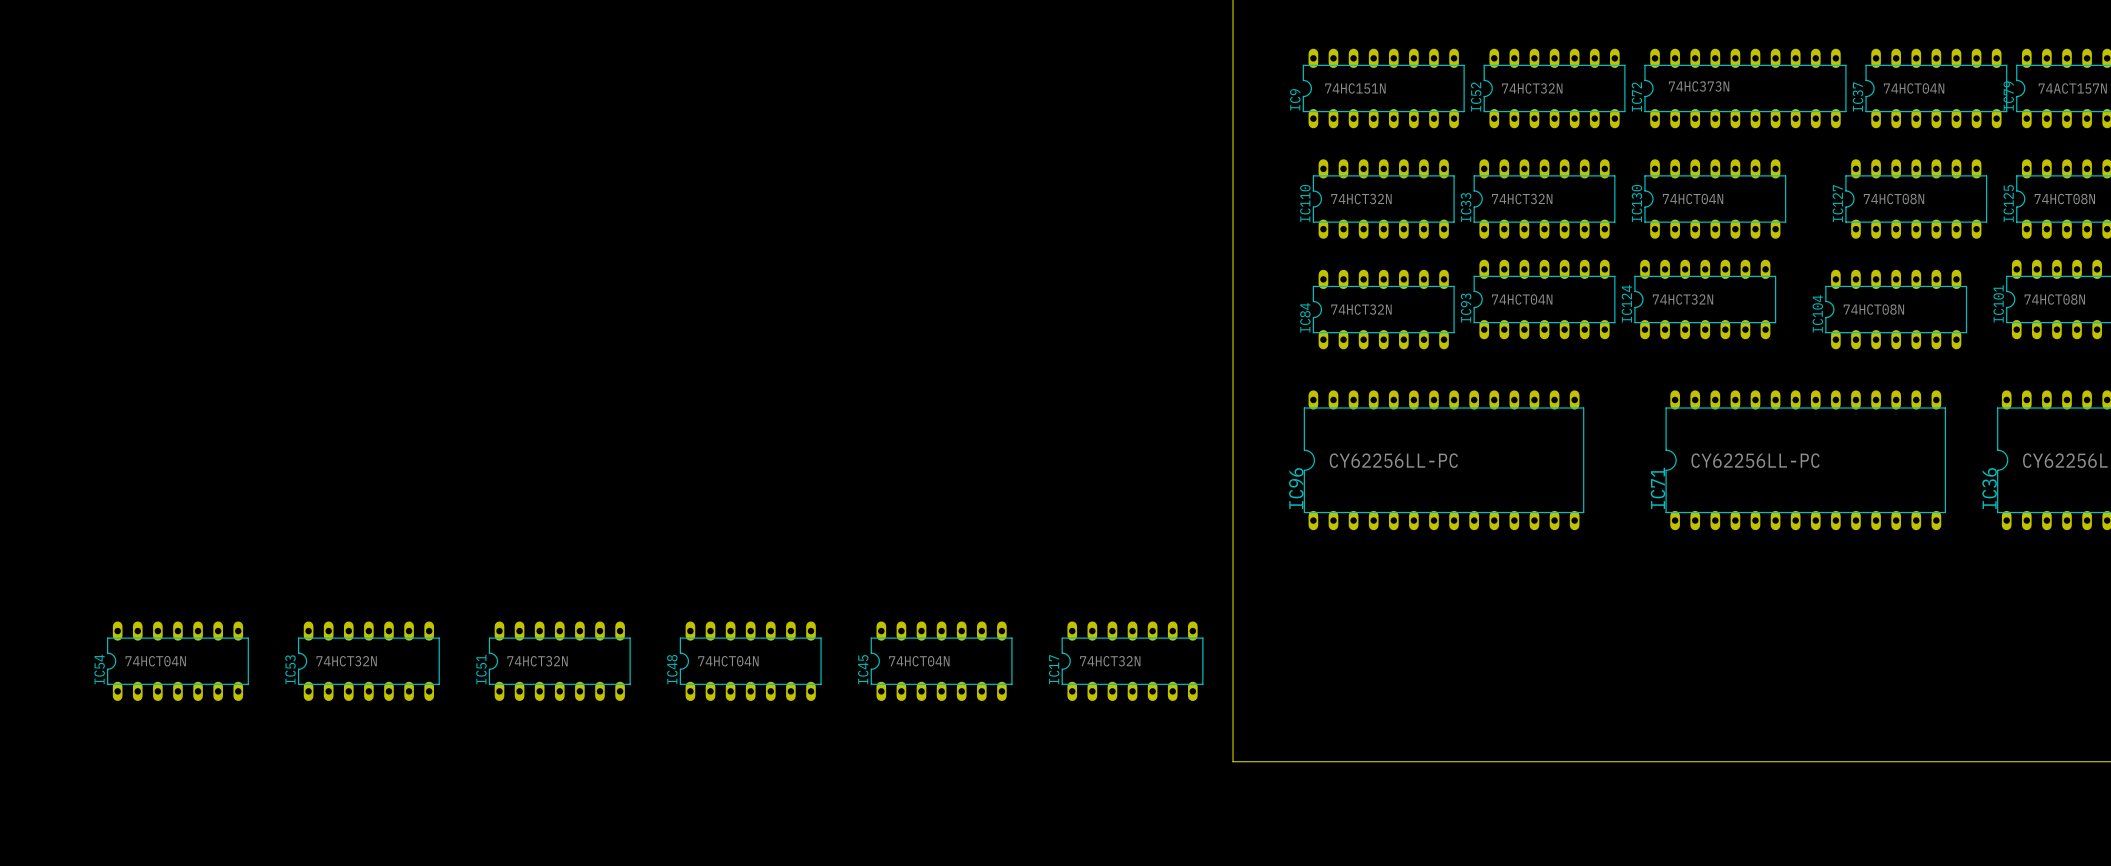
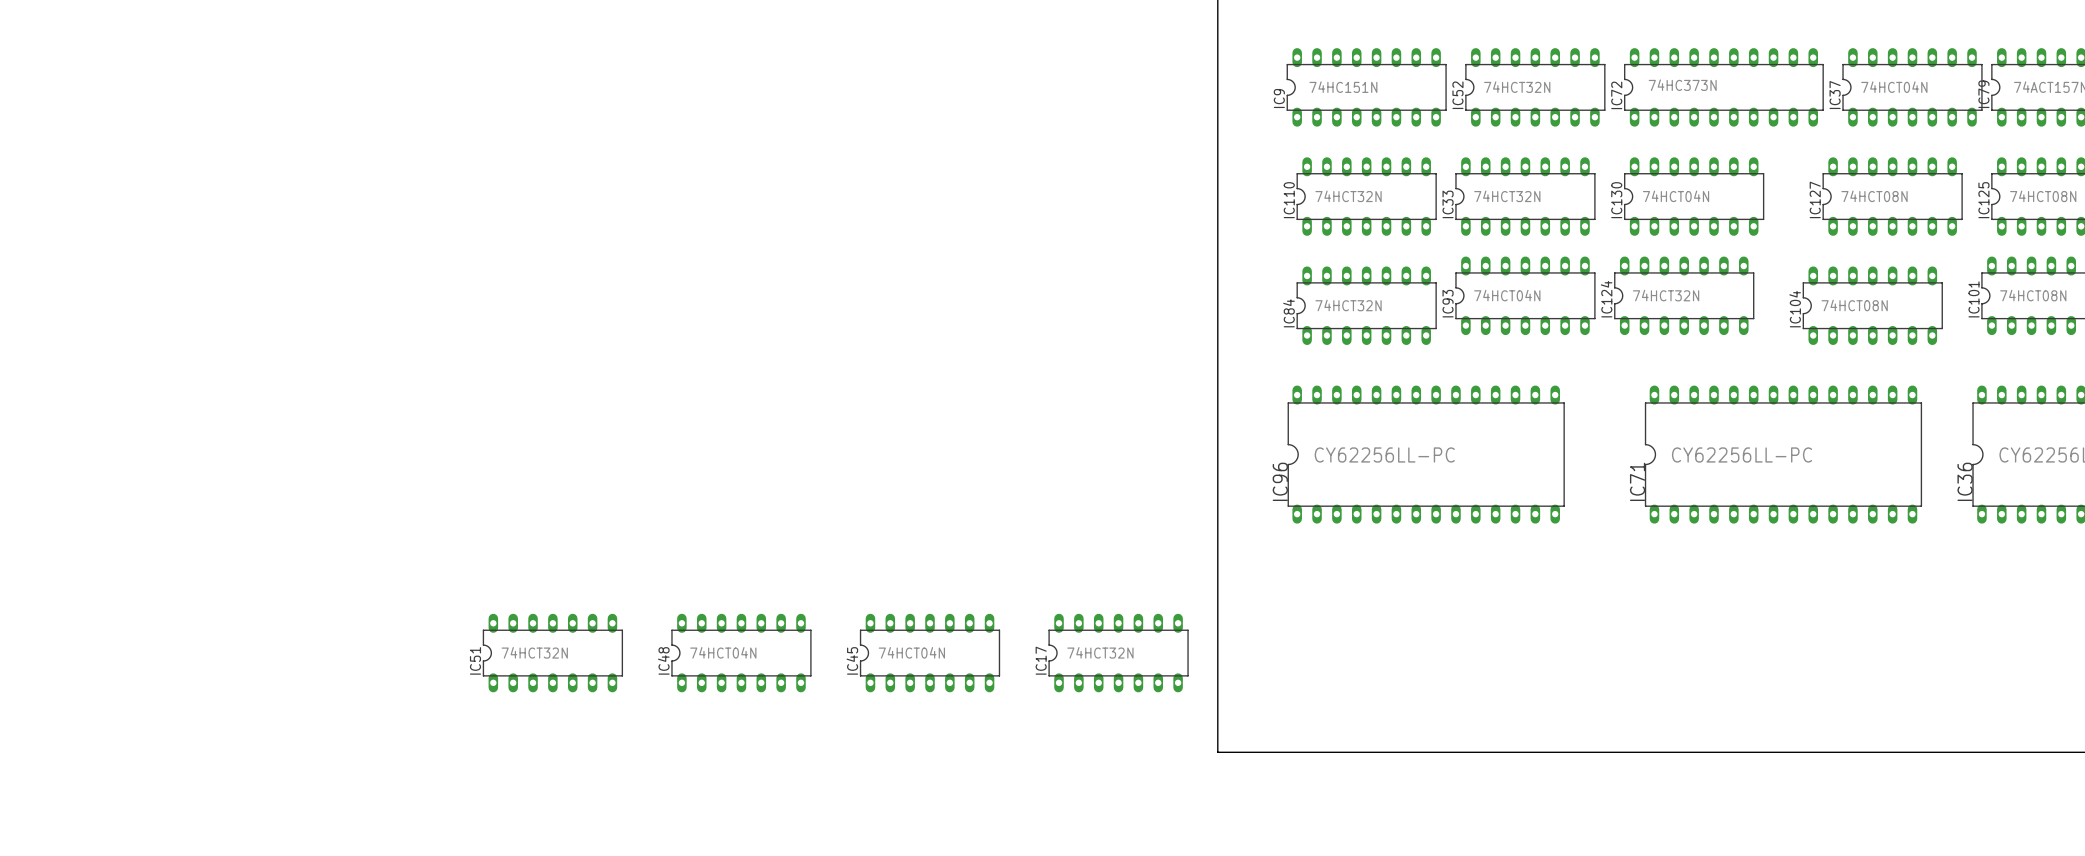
IC54: 74HCT04N (177, 661) -> none
IC53: 74HCT32N (368, 661) -> none

